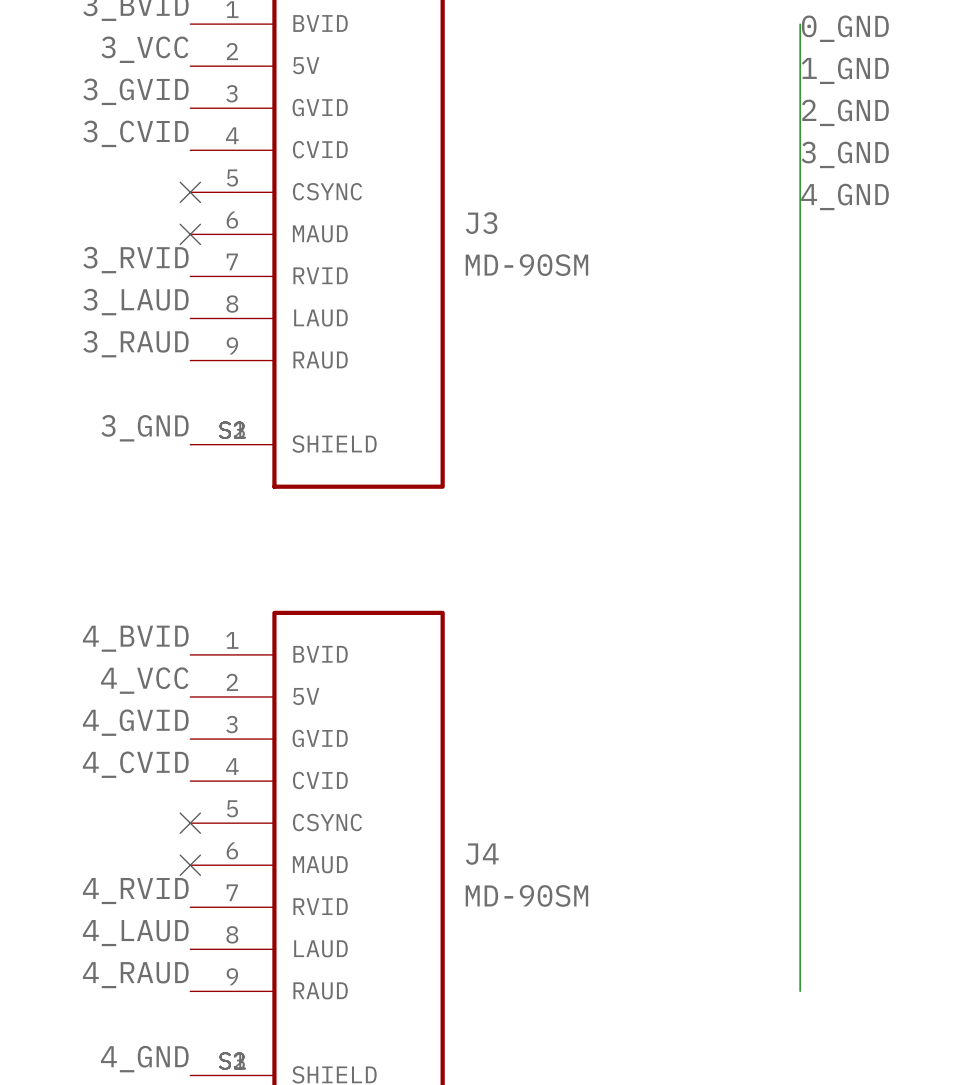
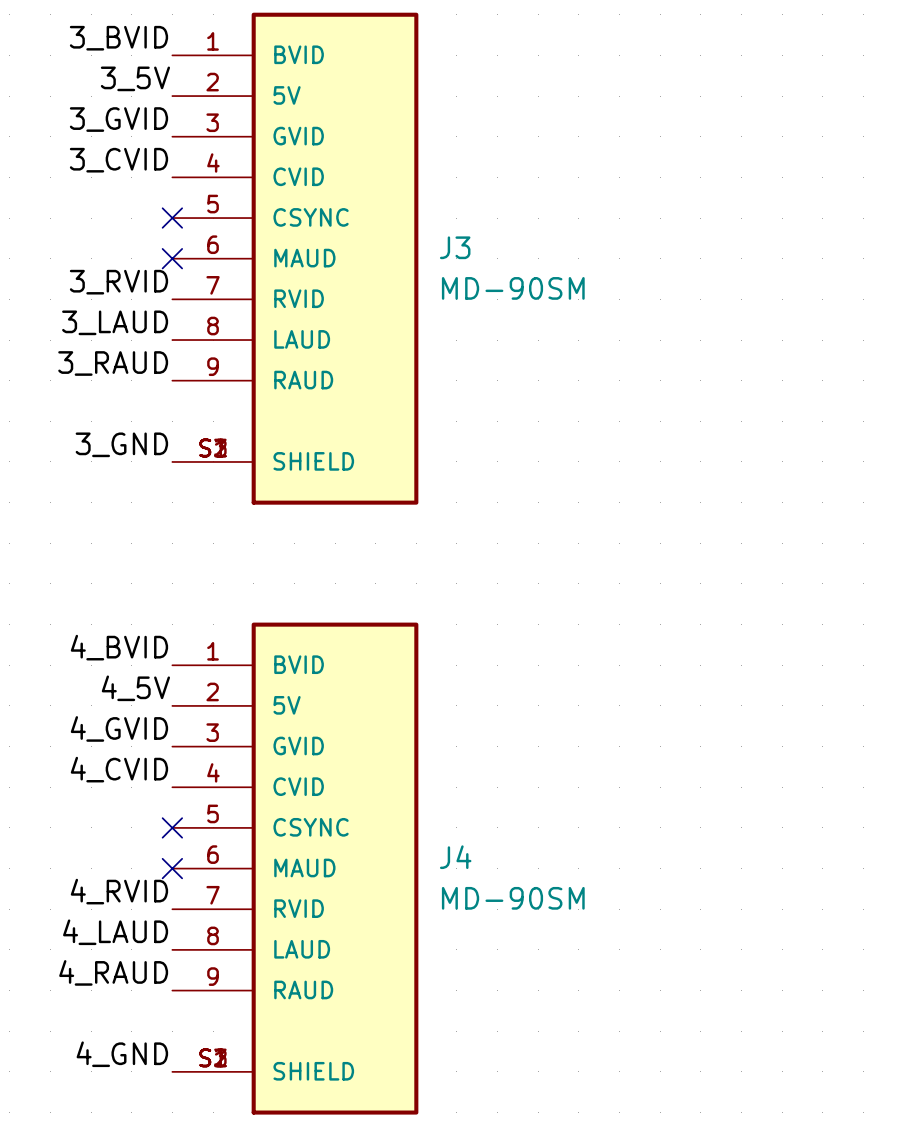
wire: (800, 24) (800, 991) -> none
label: 0_GND (845, 28) -> none
label: 3_VCC (144, 49) -> 3_5V (135, 78)
label: 1_GND (845, 70) -> none
label: 2_GND (845, 112) -> none
label: 3_GND (845, 154) -> none
label: 4_GND (844, 196) -> none
label: 4_VCC (144, 680) -> 4_5V (135, 688)

